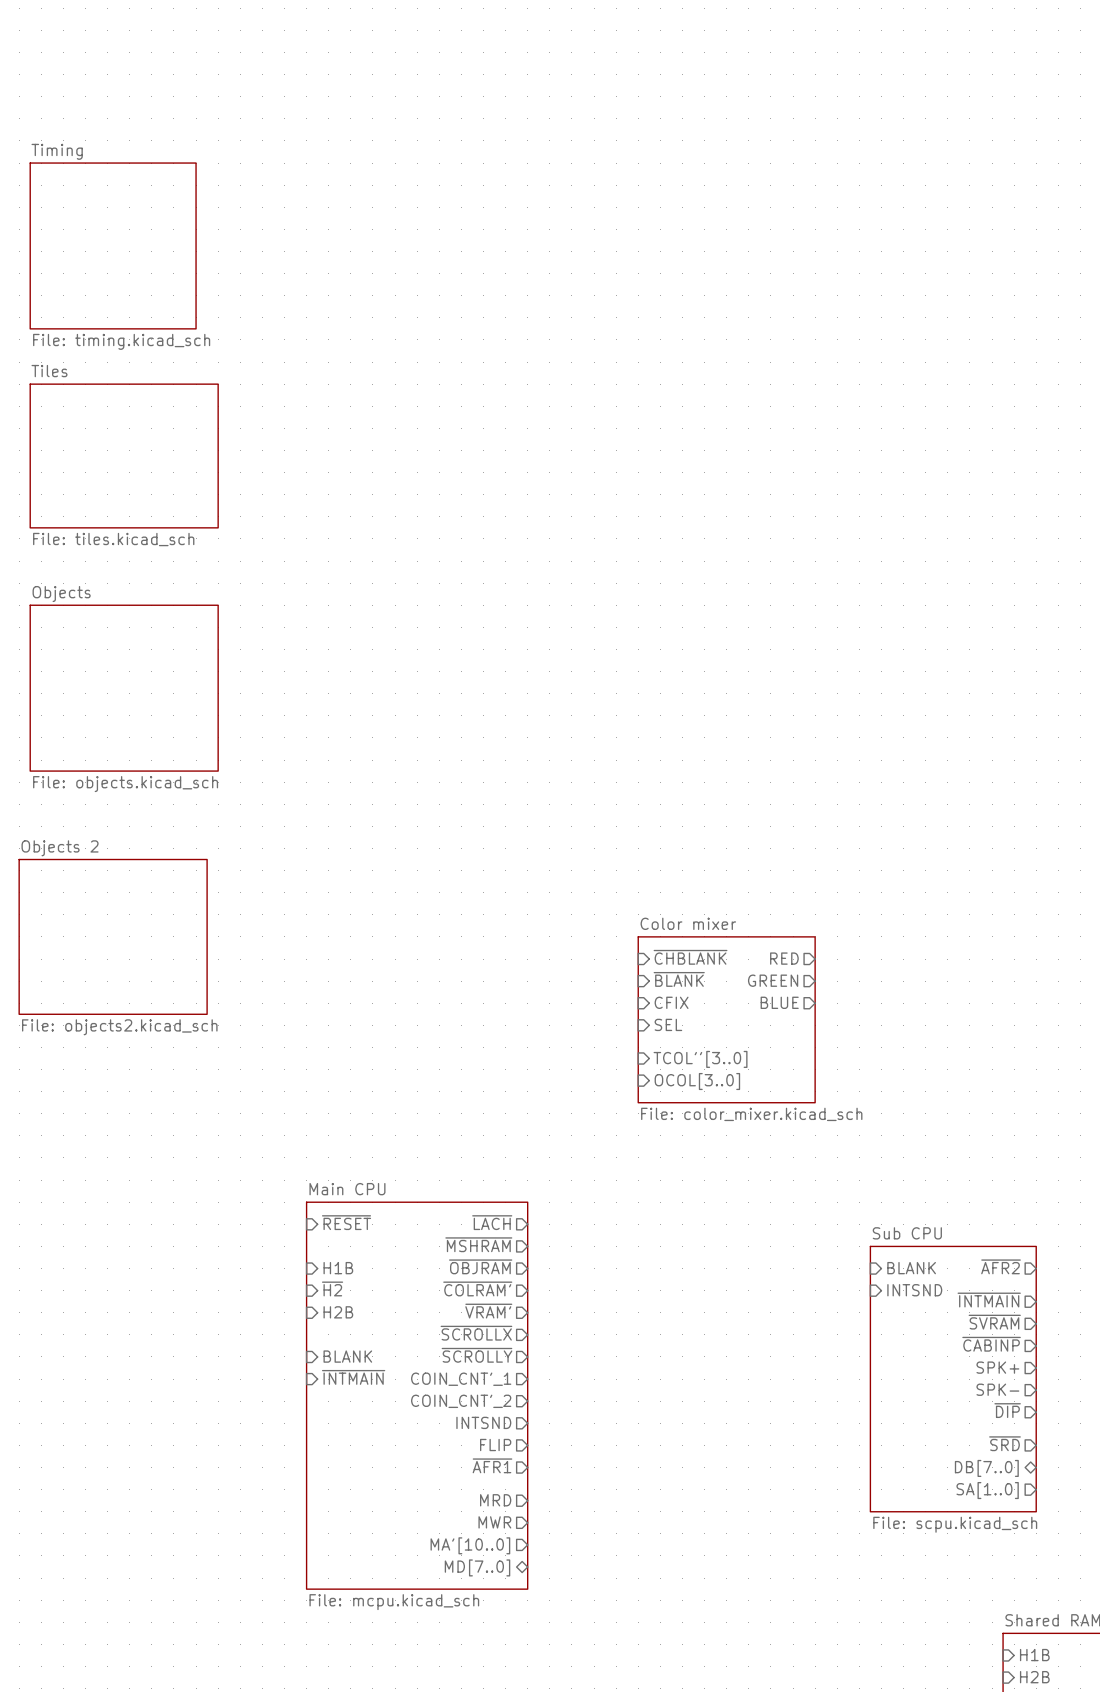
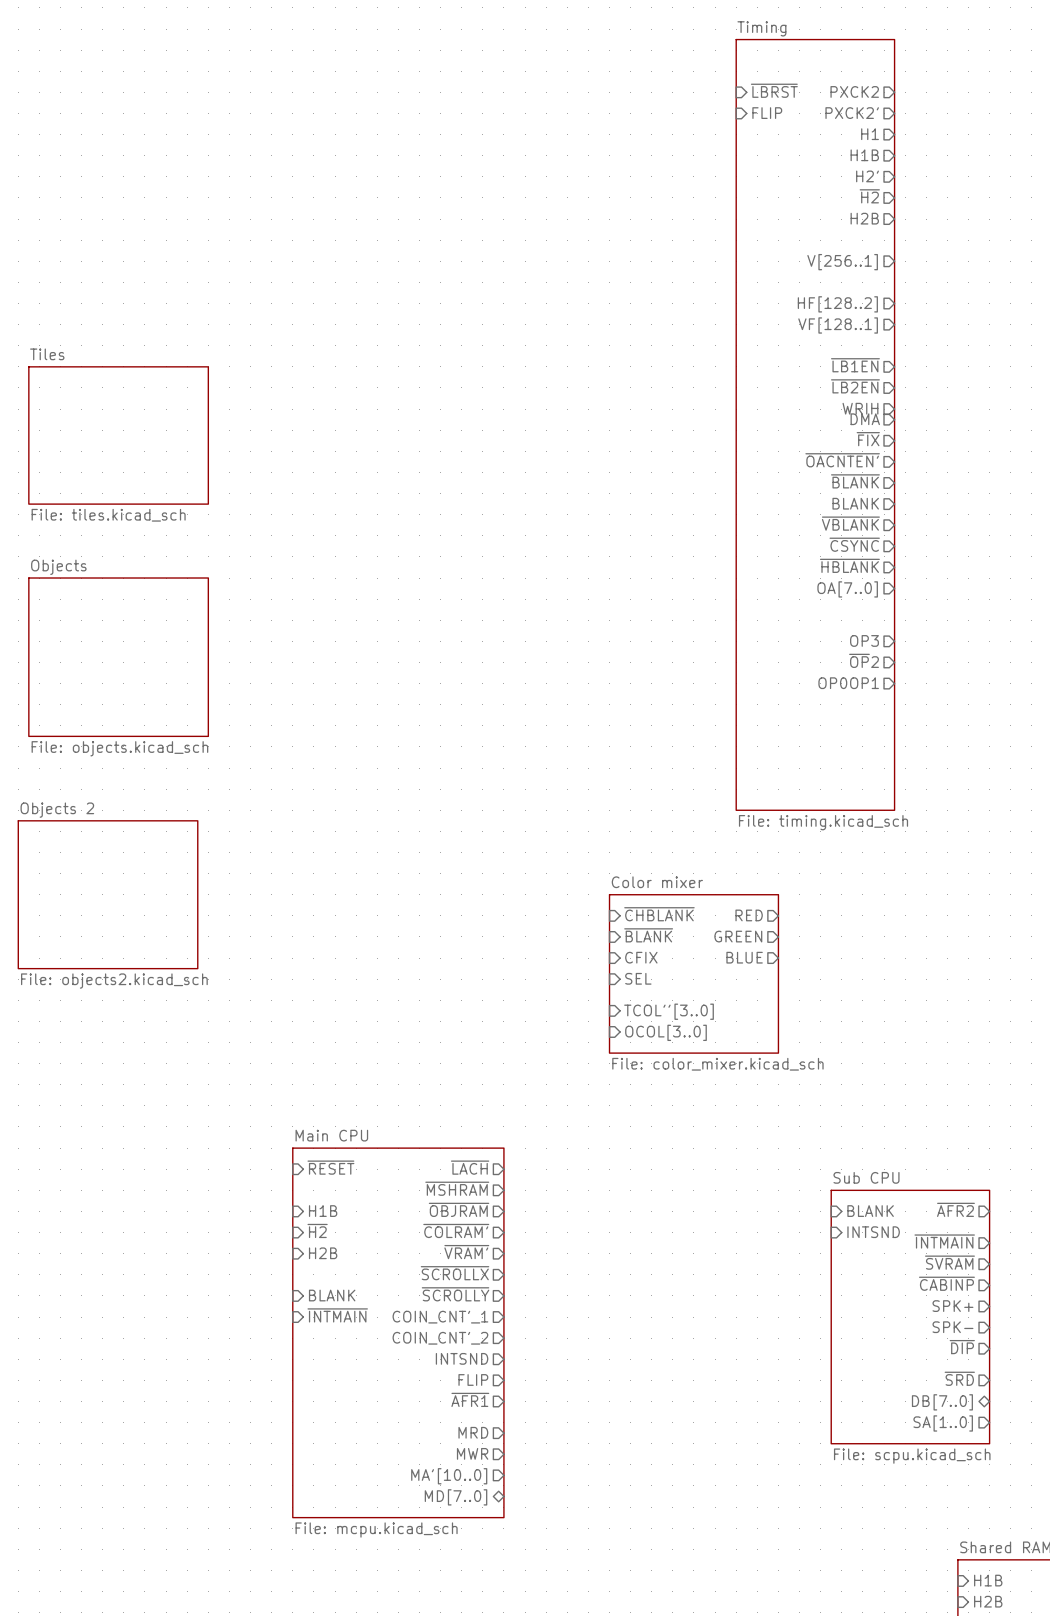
sheet pin: none -> ~{LBRST} (774, 90)
sheet pin: none -> PXCK2 (854, 91)
sheet pin: none -> FLIP (767, 113)
sheet pin: none -> PXCK2' (852, 113)
sheet pin: none -> H1 (870, 134)
sheet pin: none -> H1B (864, 155)
sheet pin: none -> H2' (867, 176)
sheet pin: none -> ~{H2} (869, 196)
sheet pin: none -> H2B (864, 218)
sheet Timing: File: timing.kicad_sch (113, 245) -> none
sheet pin: none -> V[256..1] (842, 262)
sheet pin: none -> HF[128..2] (837, 304)
sheet pin: none -> VF[128..1] (838, 325)
sheet pin: none -> ~{LB1EN} (855, 365)
sheet pin: none -> ~{LB2EN} (855, 386)
sheet pin: none -> WRIH (860, 408)
sheet pin: none -> DMA (865, 419)
sheet Timing: none -> File: timing.kicad_sch (815, 424)
sheet pin: none -> ~{FIX} (868, 439)
sheet pin: none -> ~{OACNTEN'} (842, 460)
sheet pin: none -> ~{BLANK} (855, 481)
sheet pin: none -> BLANK (855, 503)
sheet pin: none -> ~{VBLANK} (850, 523)
sheet pin: none -> ~{CSYNC} (854, 544)
sheet pin: none -> ~{HBLANK} (849, 565)
sheet pin: none -> OA[7..0] (847, 589)
sheet pin: none -> OP3 (864, 640)
sheet pin: none -> ~{OP}2 (864, 660)
sheet pin: none -> OP0OP1 (848, 683)

